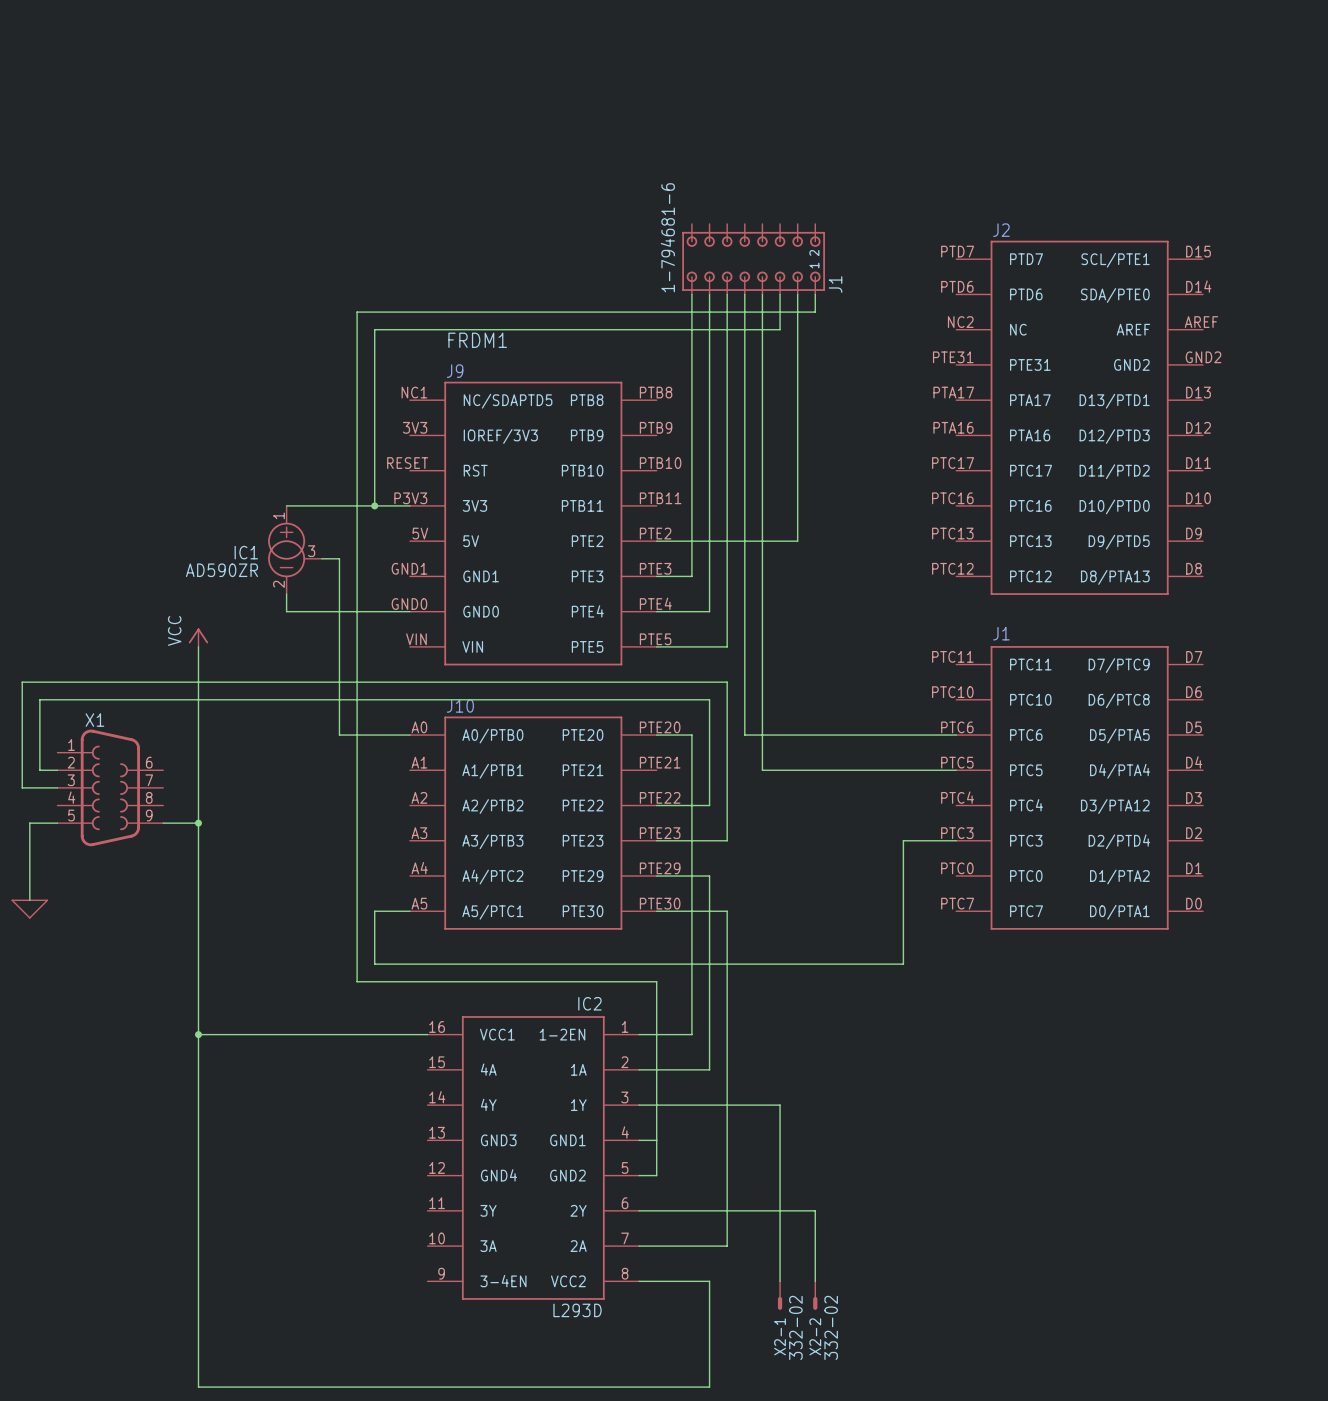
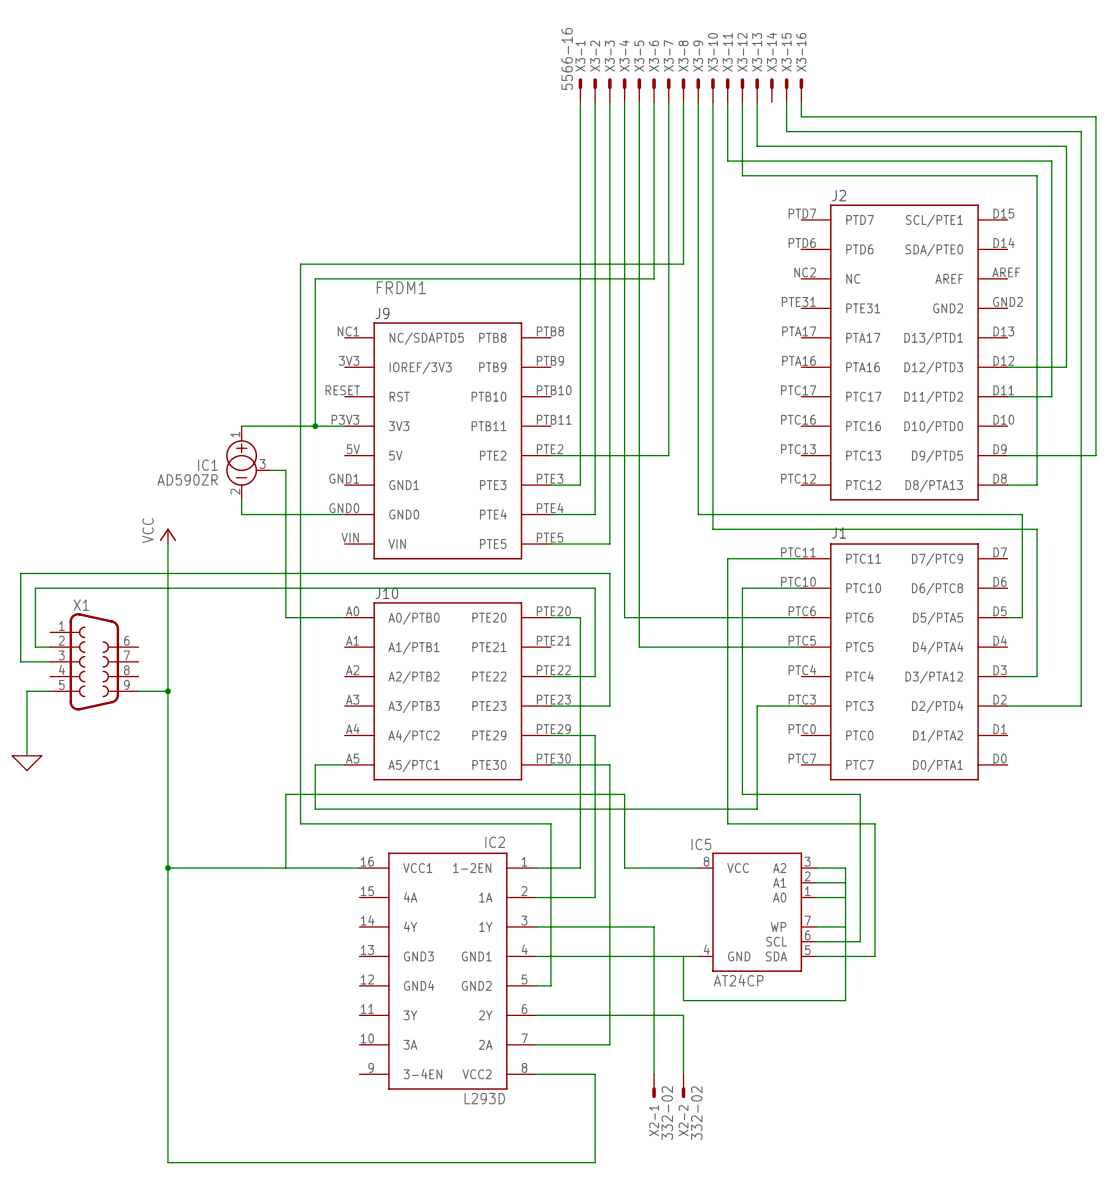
X3-1: none -> 5566-16 (580, 90)
X3-2: none -> (595, 90)
X3-3: none -> (609, 90)
X3-4: none -> (624, 90)
X3-5: none -> (639, 90)
X3-6: none -> (654, 90)
X3-7: none -> (668, 90)
X3-8: none -> (683, 90)
X3-9: none -> (698, 90)
X3-10: none -> (712, 90)
X3-11: none -> (727, 90)
X3-12: none -> (742, 90)
X3-13: none -> (757, 90)
X3-14: none -> (771, 90)
X3-15: none -> (786, 90)
X3-16: none -> (801, 90)
wire: none -> (580, 102) (580, 249)
wire: none -> (595, 102) (595, 249)
wire: none -> (609, 102) (609, 249)
wire: none -> (624, 102) (624, 249)
wire: none -> (639, 102) (639, 249)
wire: none -> (654, 102) (654, 249)
wire: none -> (668, 102) (668, 249)
wire: none -> (683, 102) (683, 249)
wire: none -> (698, 102) (698, 514) (1022, 514) (1022, 617) (1007, 617)
wire: none -> (712, 102) (712, 529) (1037, 529) (1037, 676) (1007, 676)
wire: none -> (727, 102) (727, 161) (1051, 161) (1051, 396) (1007, 396)
wire: none -> (742, 102) (742, 175) (1037, 175) (1037, 485) (1007, 485)
wire: none -> (757, 102) (757, 146) (1066, 146) (1066, 367) (1007, 367)
wire: none -> (786, 102) (786, 131) (1081, 131) (1081, 706) (1007, 706)
wire: none -> (801, 102) (801, 116) (1095, 116) (1095, 455) (1007, 455)
J1: 1-794681-6 (753, 259) -> none
wire: none -> (801, 558) (727, 558) (727, 823) (875, 823) (875, 956) (816, 956)
wire: none -> (801, 588) (742, 588) (742, 794) (860, 794) (860, 941) (816, 941)
wire: none -> (285, 868) (285, 794) (624, 794) (624, 868) (698, 868)
wire: none -> (816, 868) (845, 868) (845, 1000) (683, 1000) (683, 956)
wire: none -> (816, 882) (845, 882)
wire: none -> (816, 897) (845, 897)
IC5: none -> AT24CP (757, 912)
wire: none -> (816, 926) (845, 926)
wire: none -> (550, 956) (698, 956)

